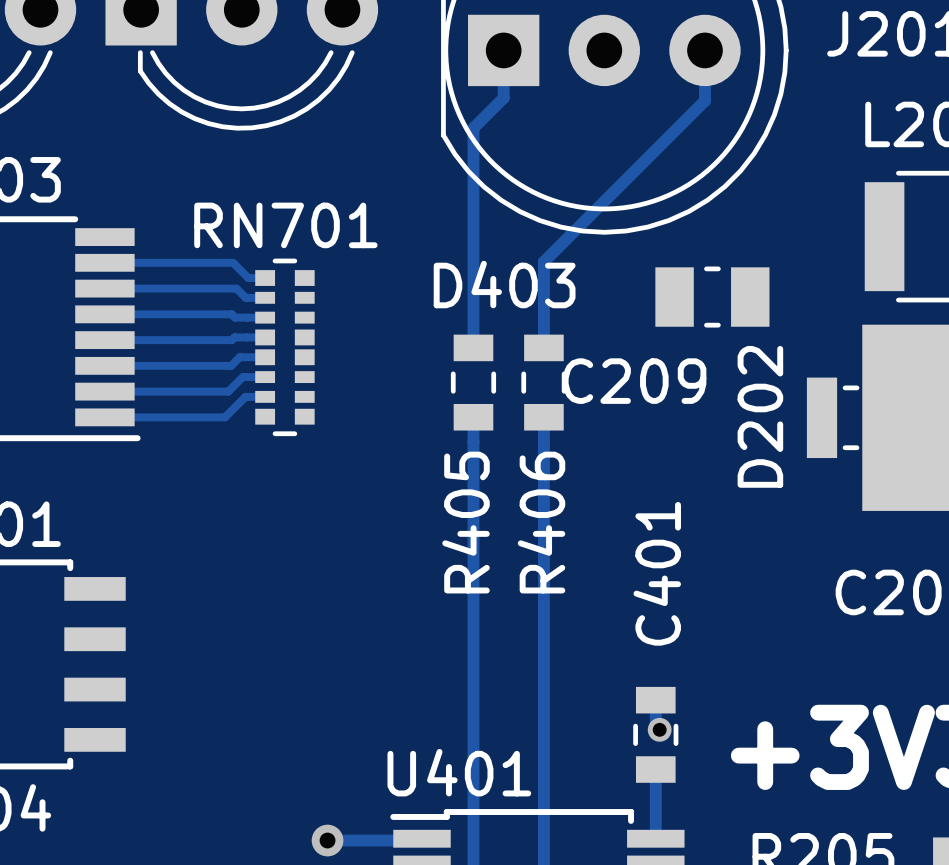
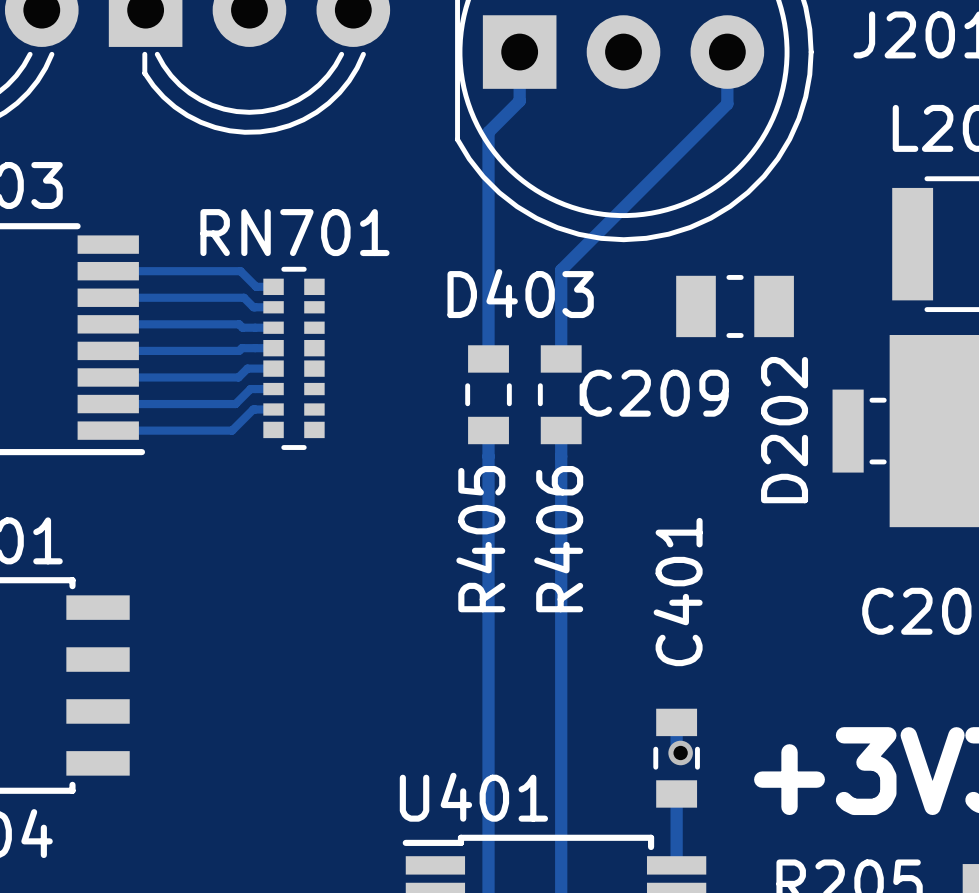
track: (422, 838) (420, 840) (327, 840) -> none
via: (327, 840) -> none

